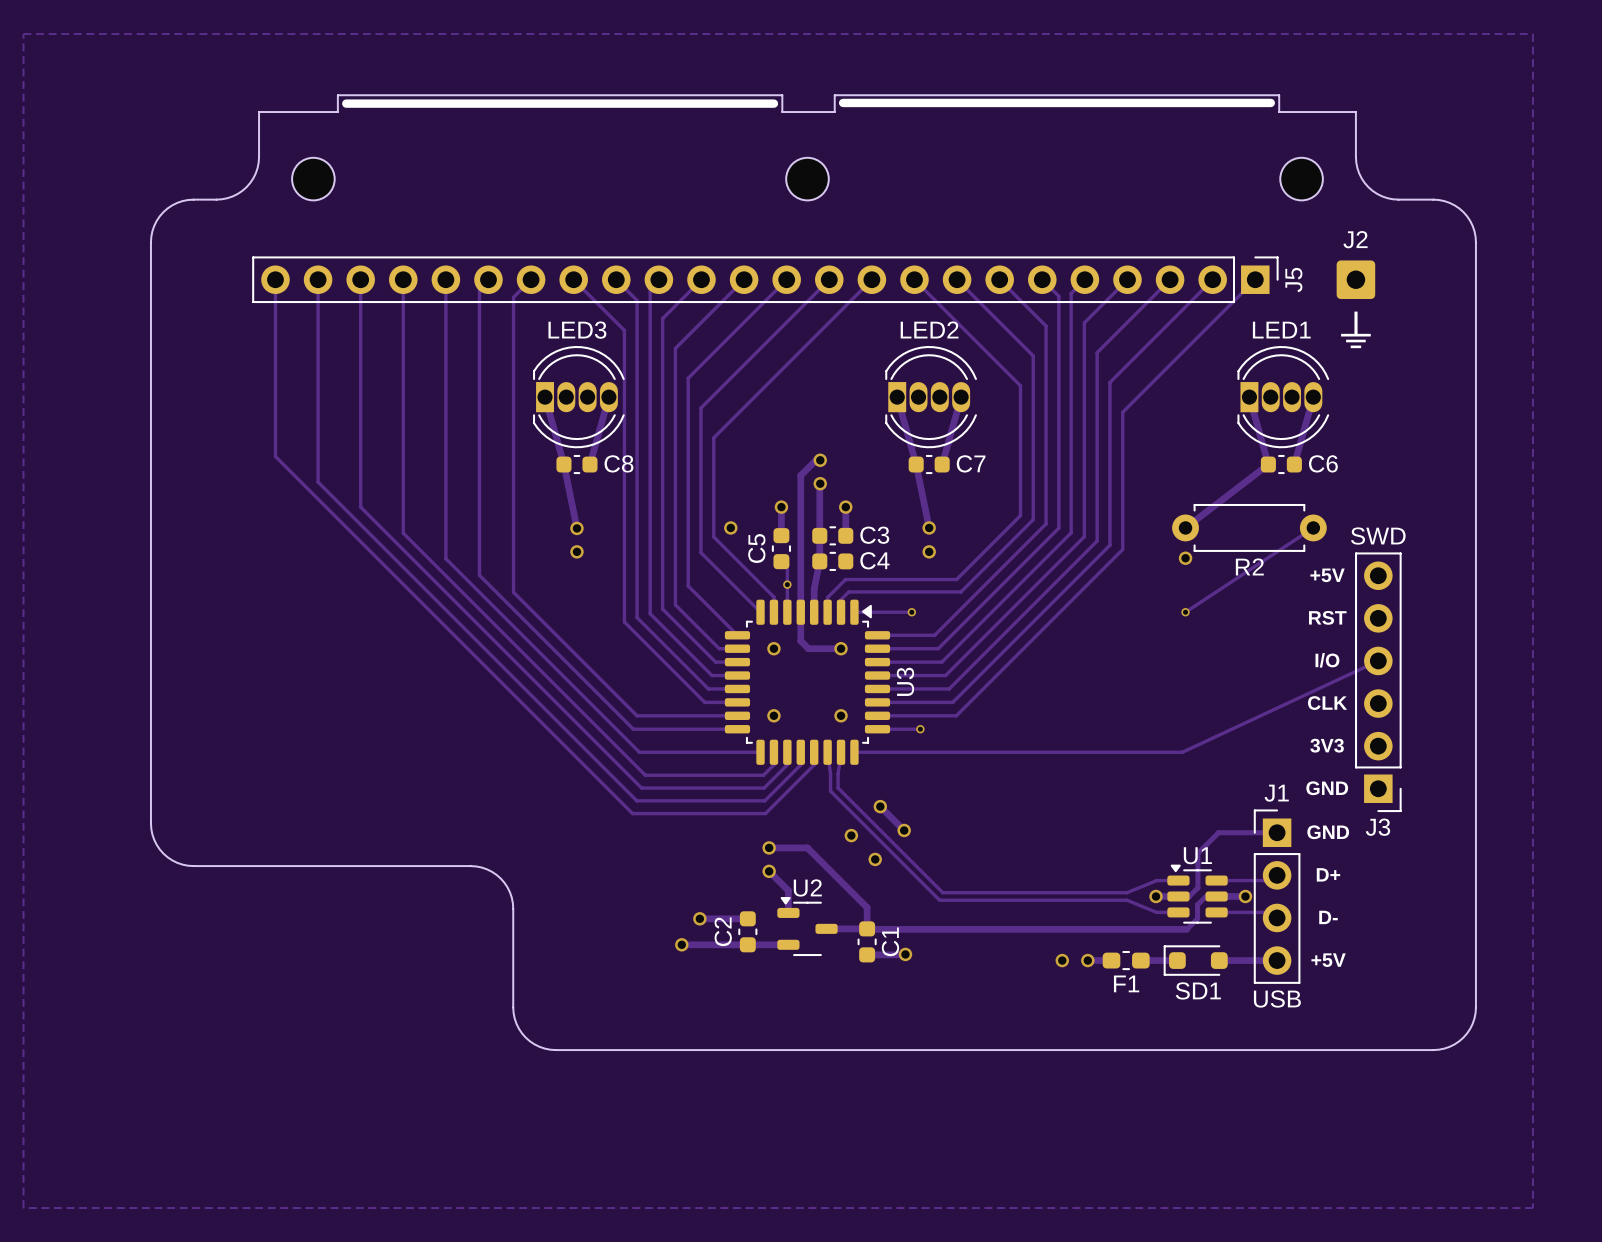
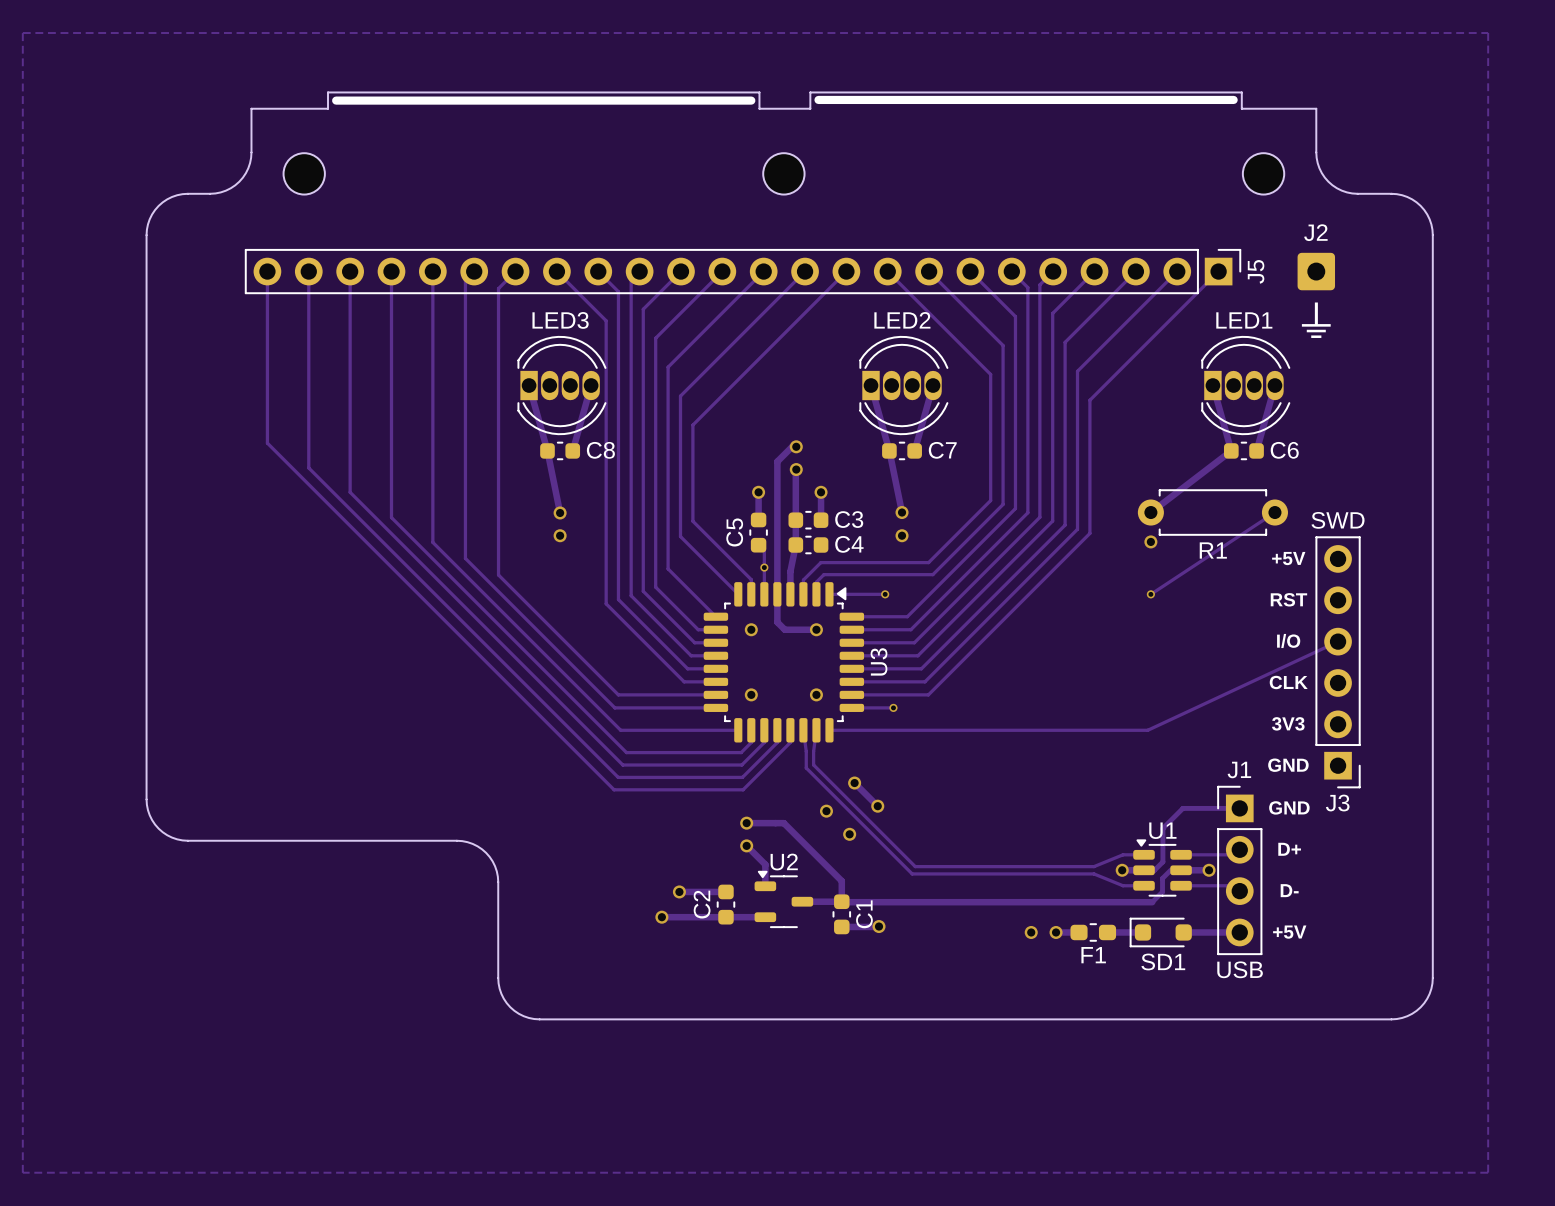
via: (730, 527) -> none
R2 name: R2 (1249, 566) -> R1 (1213, 550)

